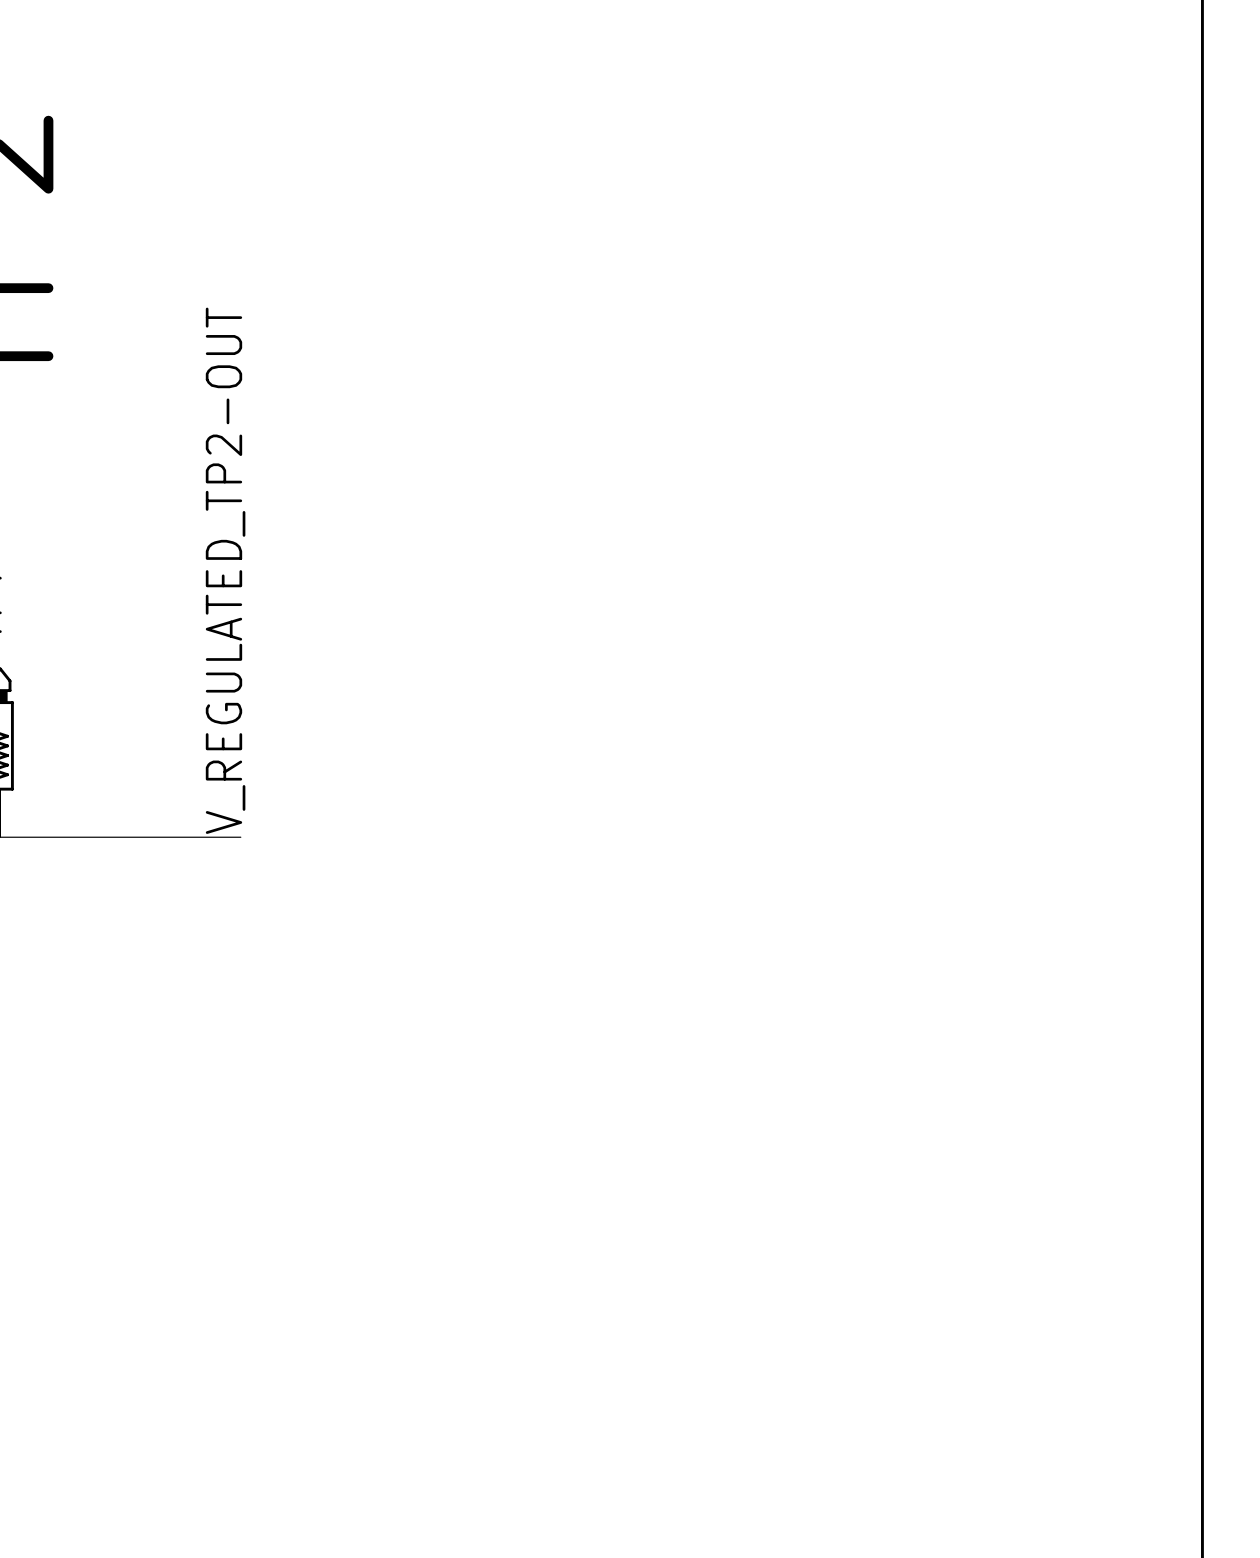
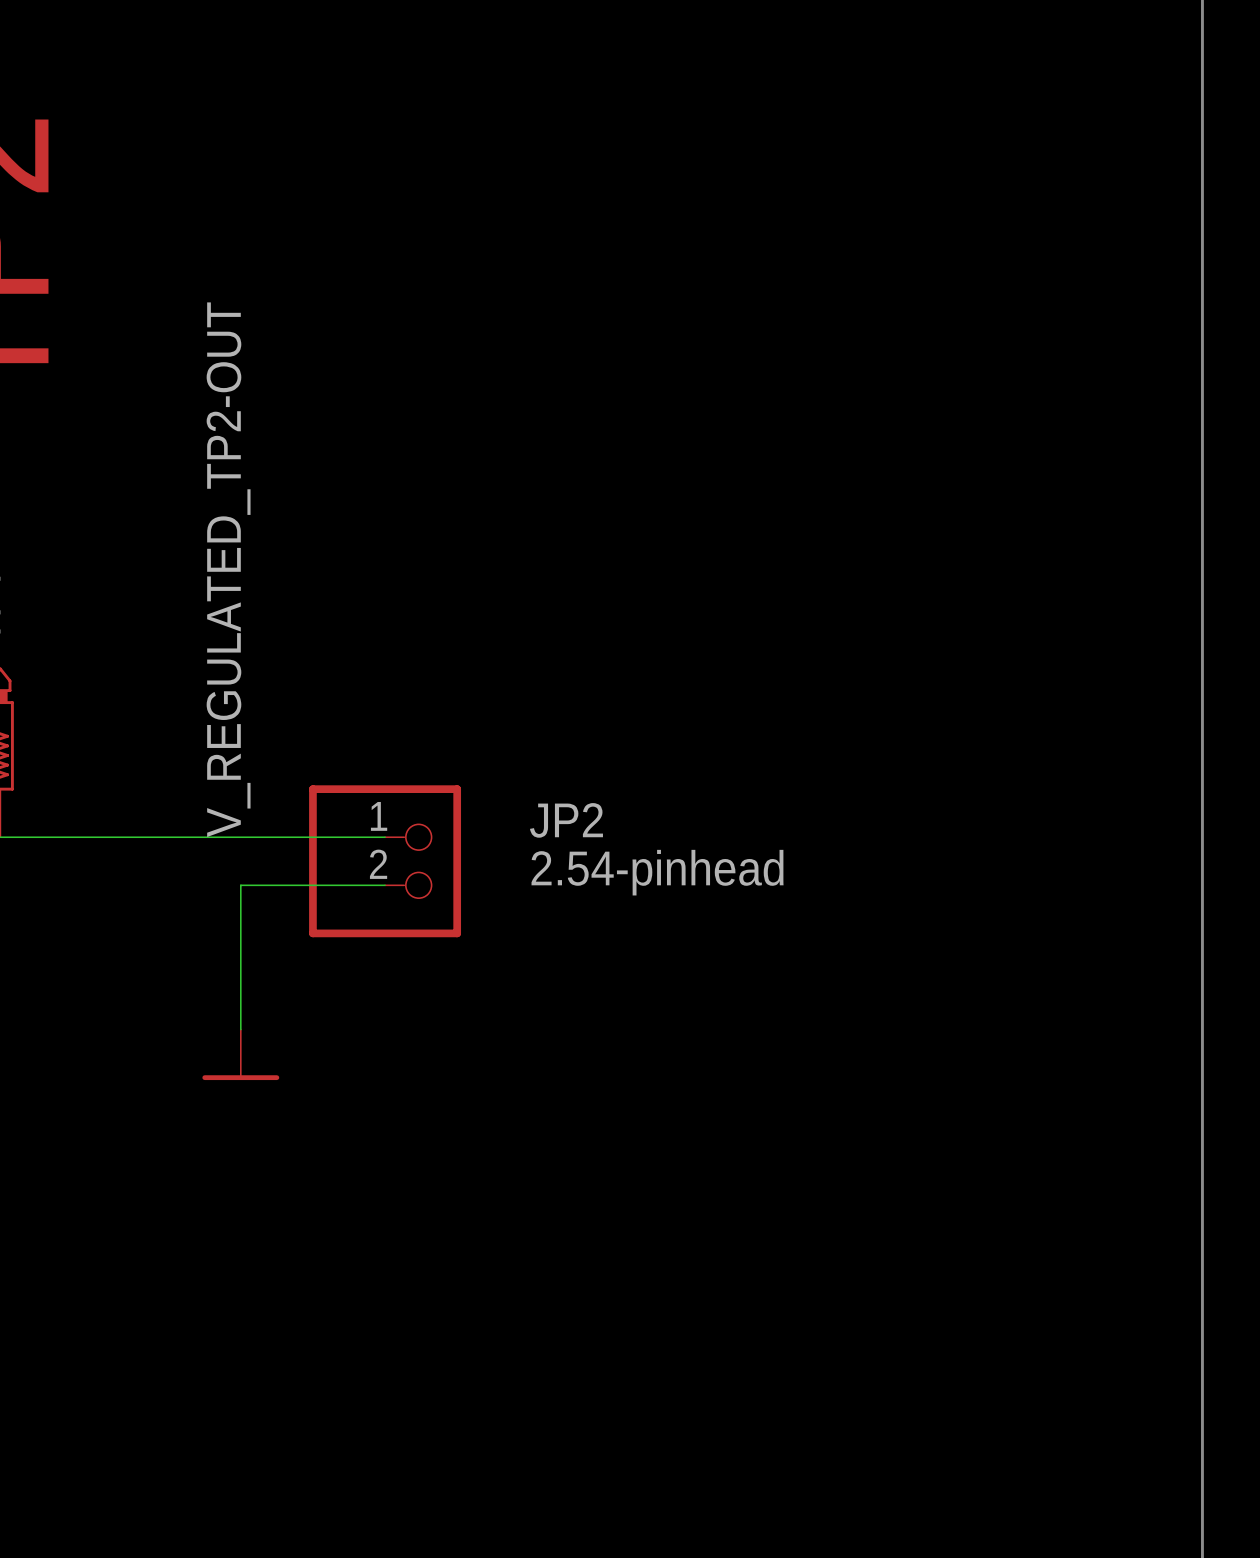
wire: none -> (240, 837) (385, 837)
JP2: none -> 2.54-pinhead (385, 861)
wire: none -> (385, 885) (240, 885) (240, 1029)
power symbol: none -> (240, 1054)

